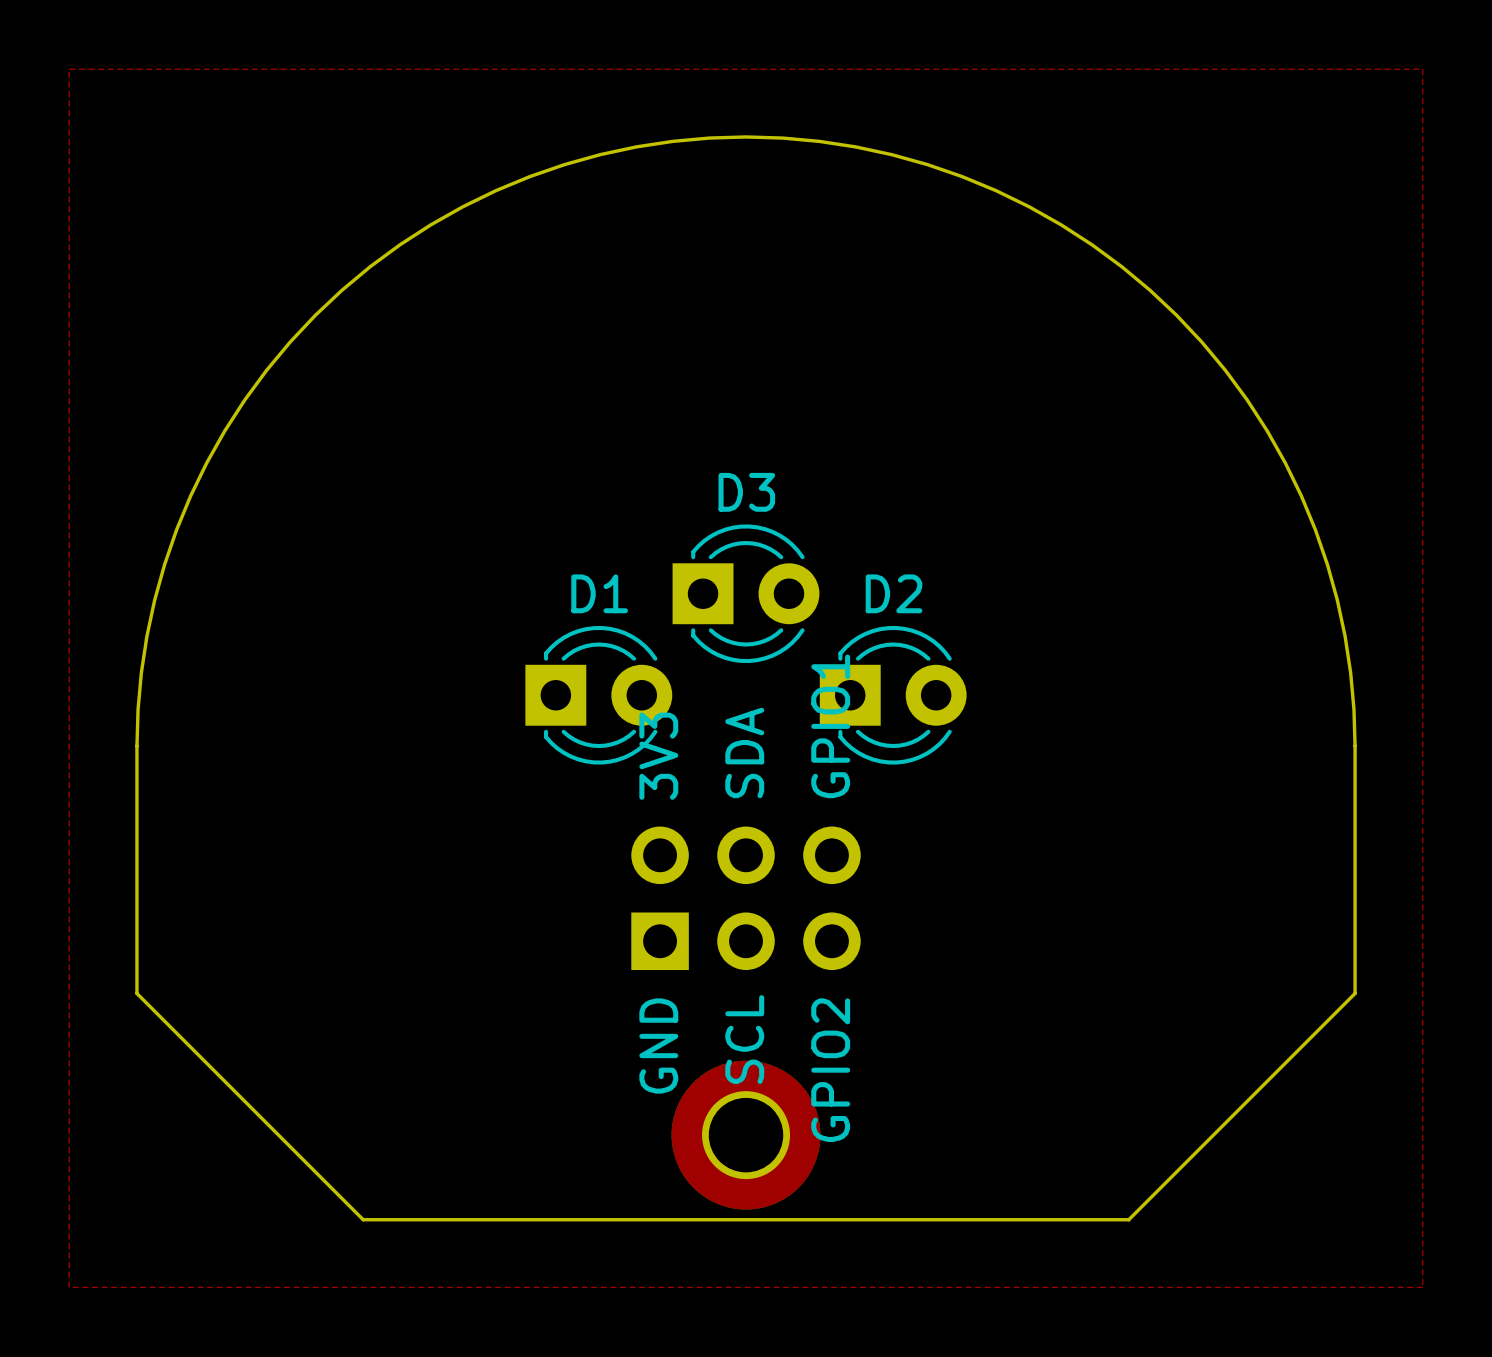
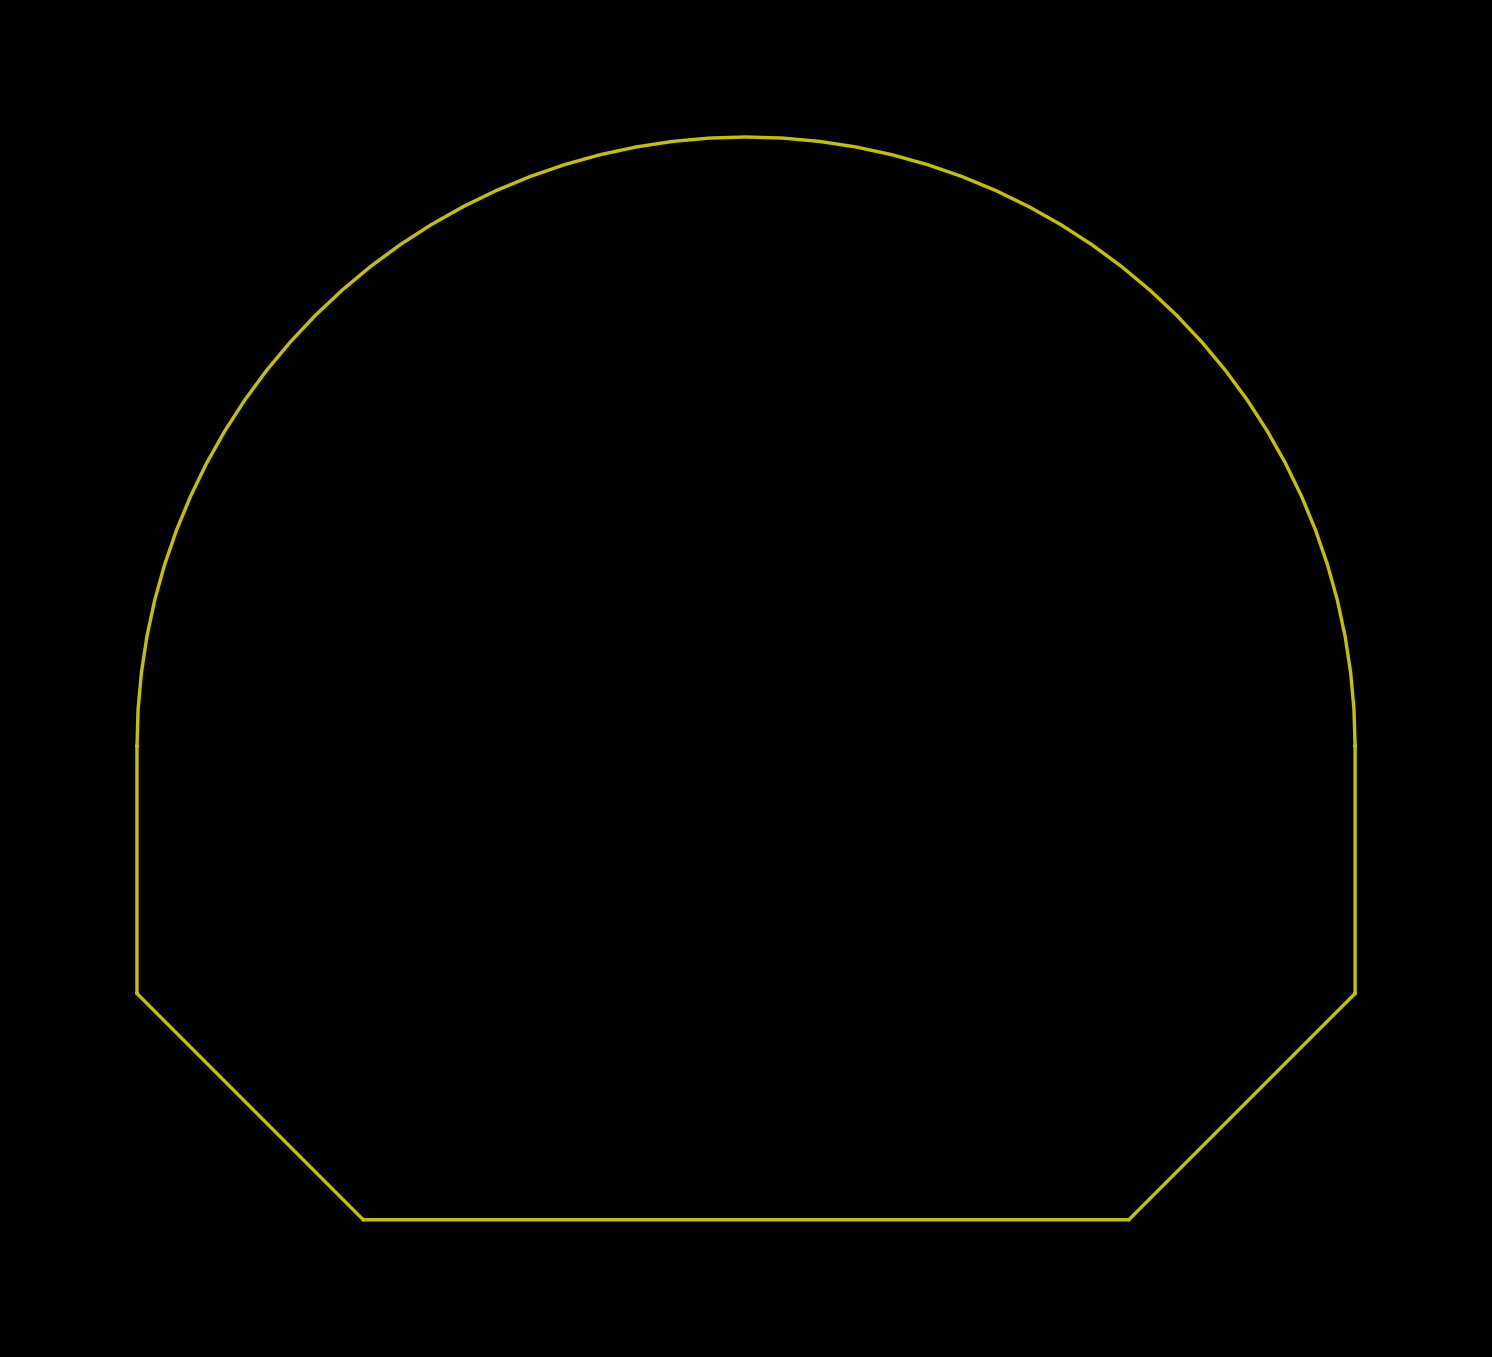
top zone outline: (69, 69) (1422, 69) (1422, 1287) (69, 1287) (69, 69) -> none
D3: (746, 593) -> none
D1: (598, 695) -> none
D2: (893, 695) -> none
part: (746, 898) -> none
part: (746, 1135) -> none

